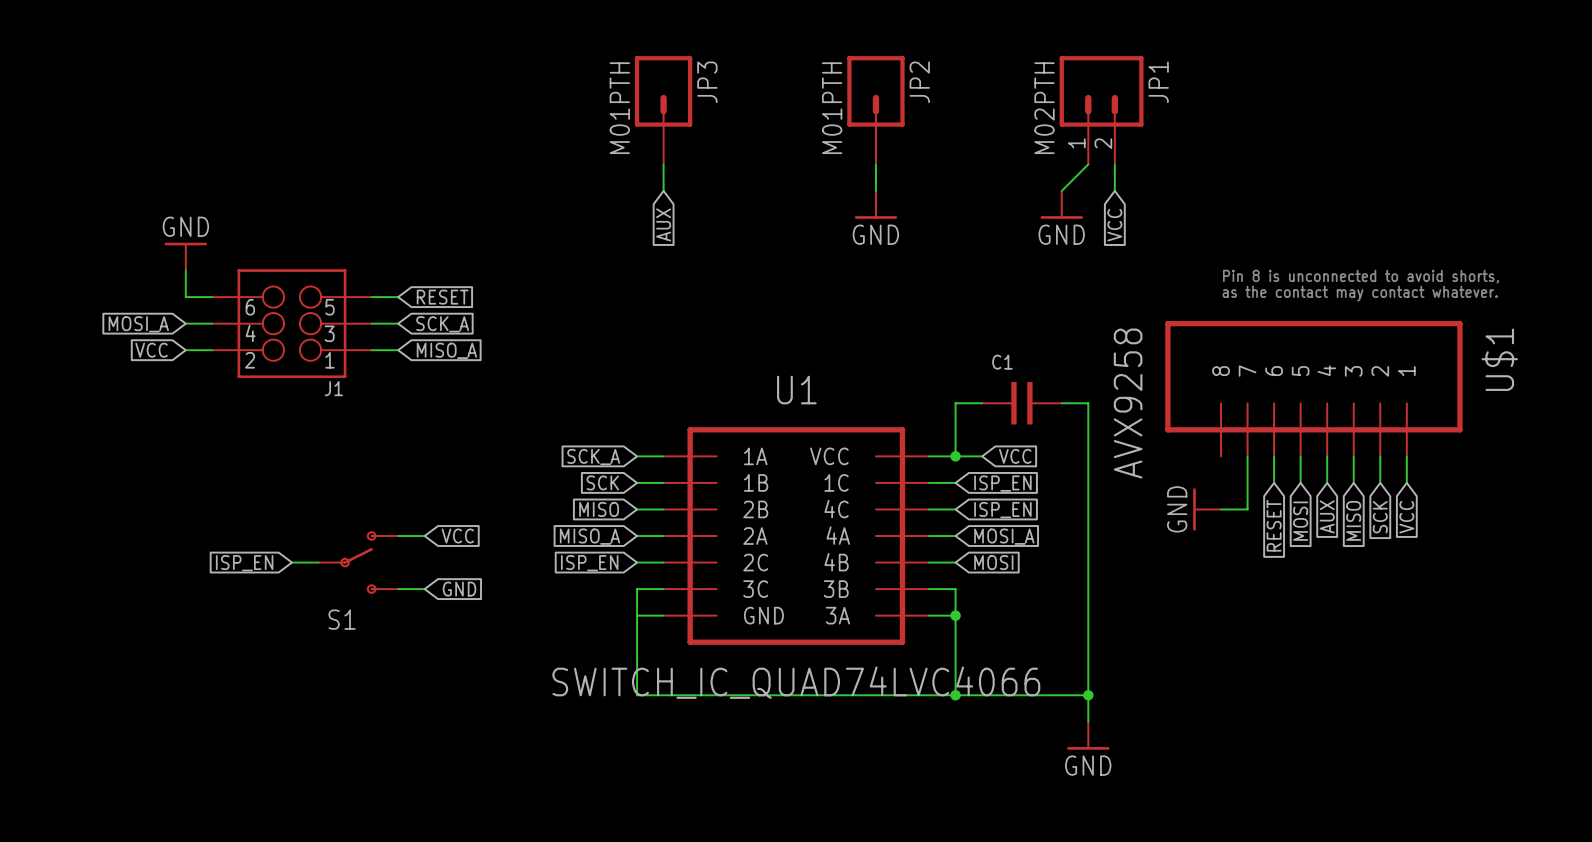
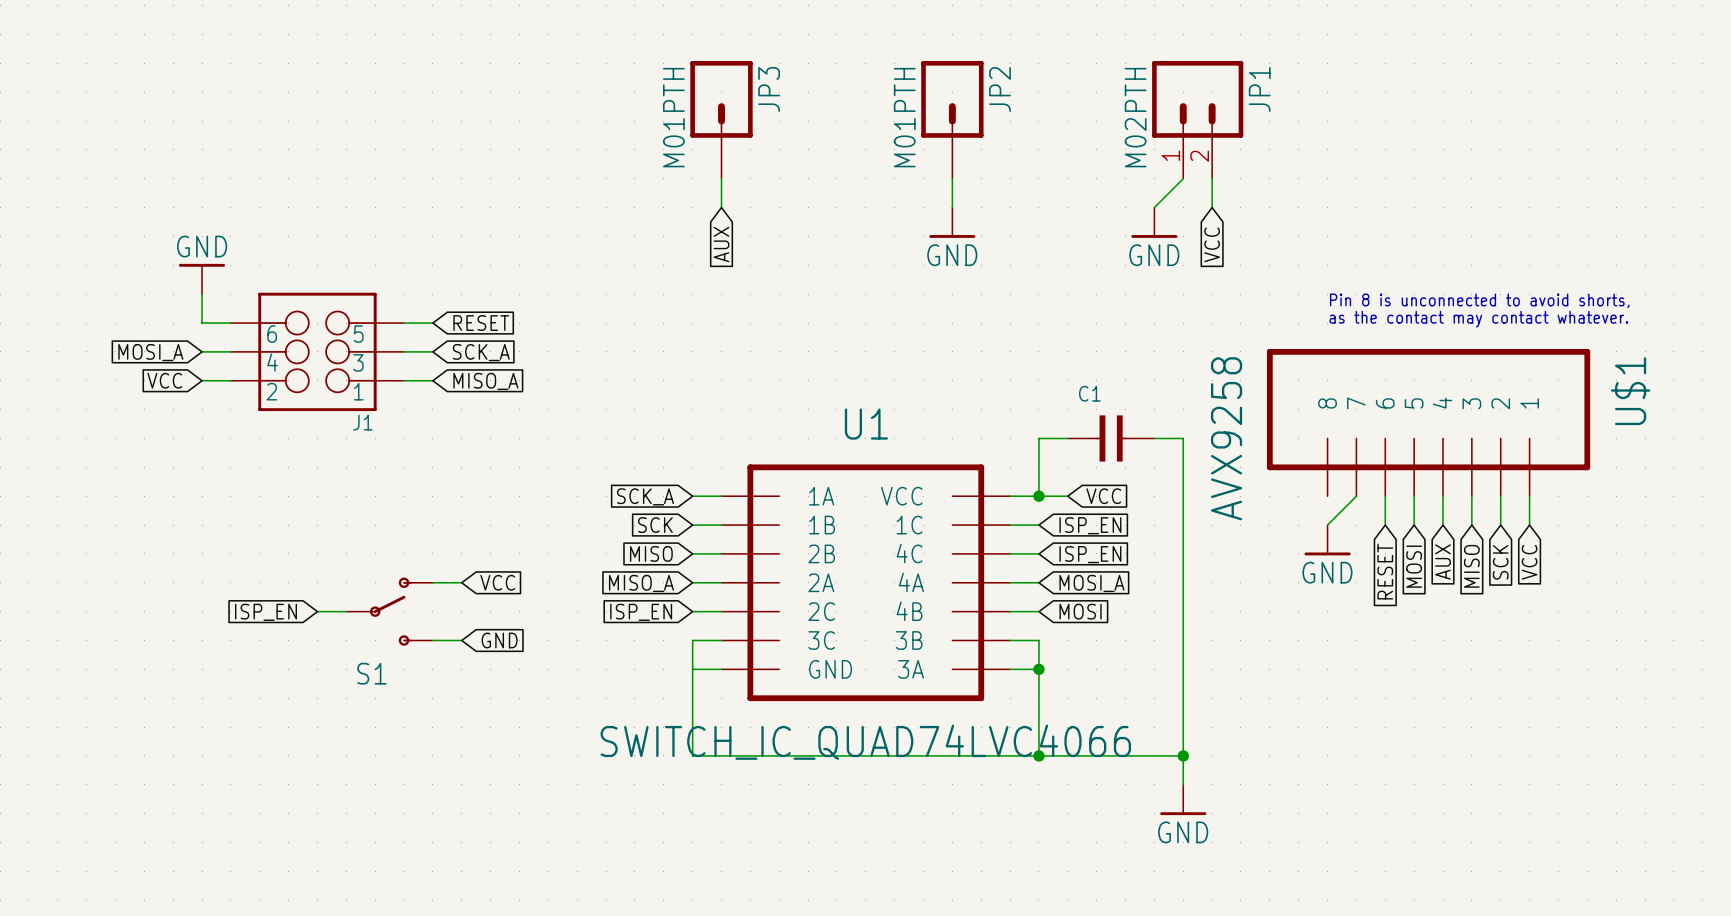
wire: (1247, 456) (1247, 509) (1221, 509) -> (1356, 496) (1327, 525)
power symbol rotation: 0° (1194, 509) -> 90° counterclockwise (1327, 553)

